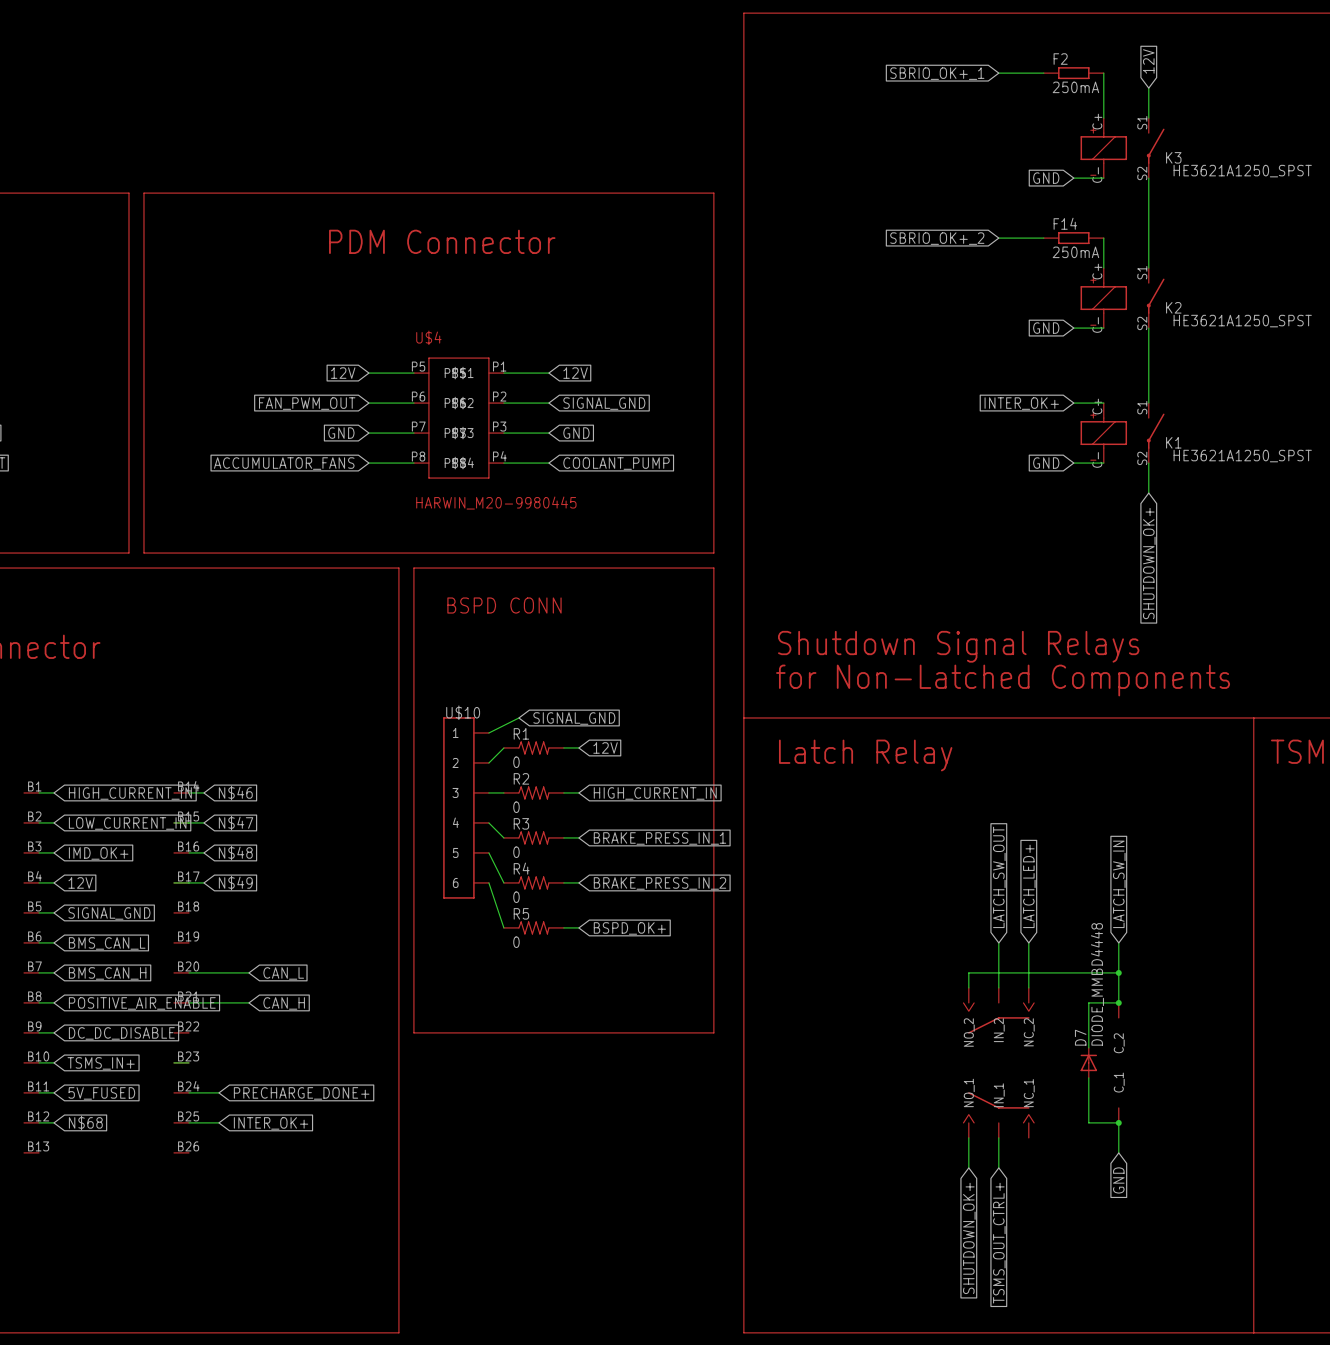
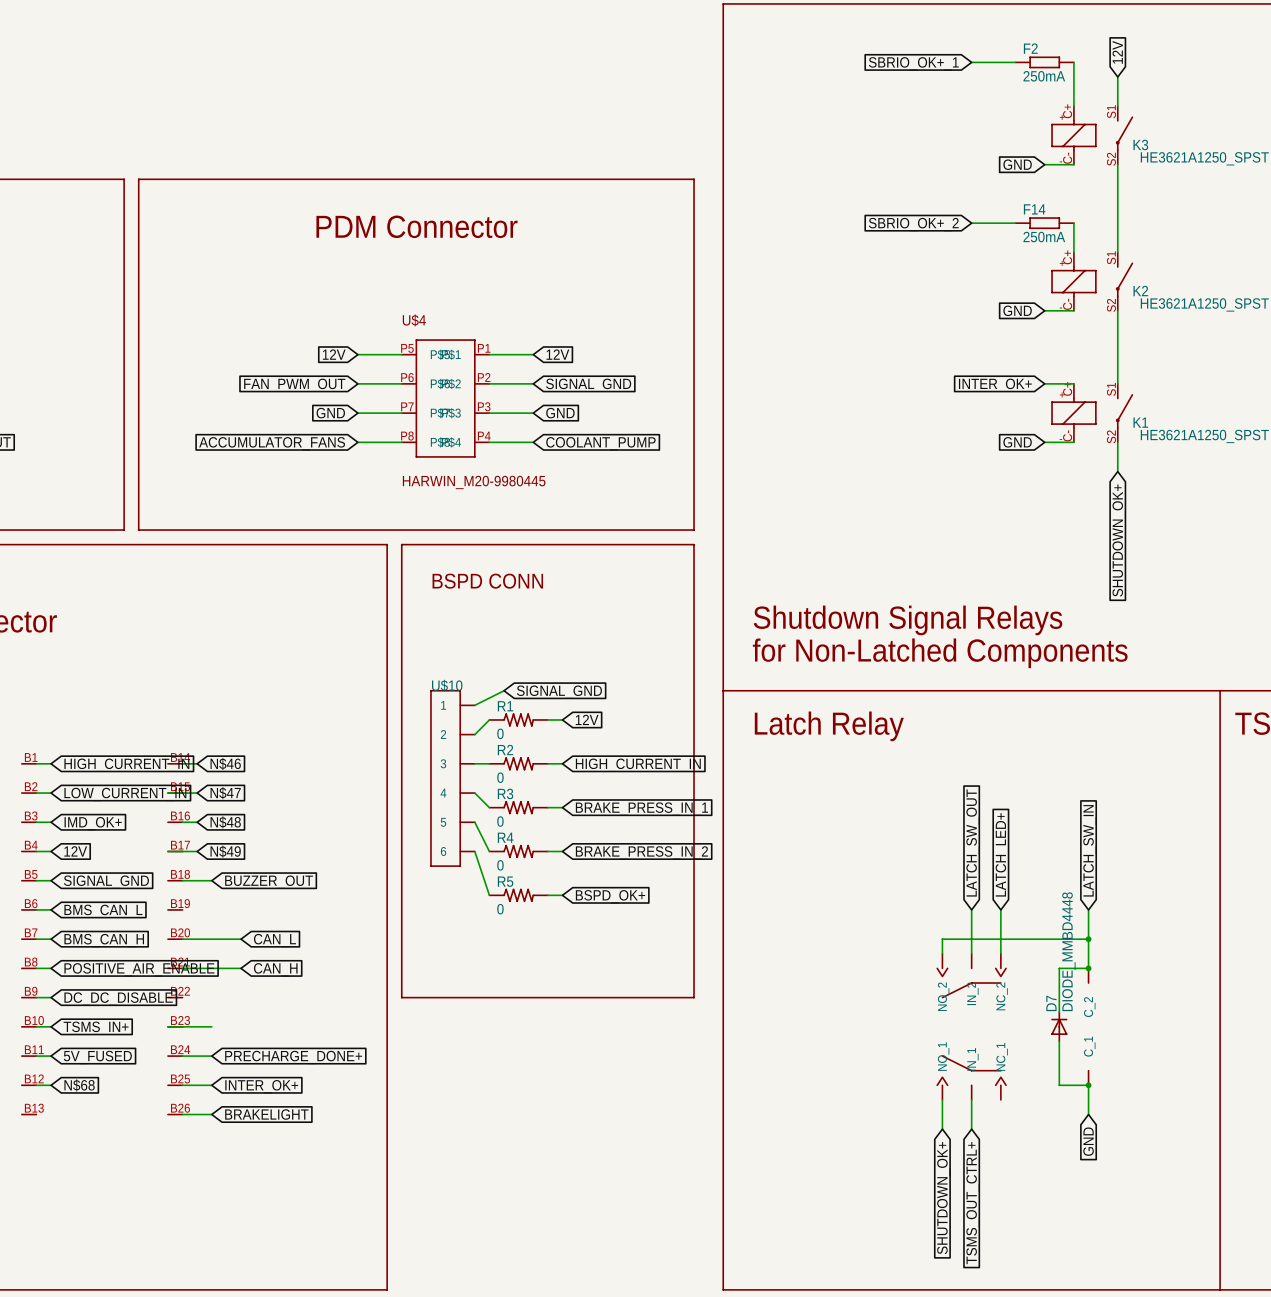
wire: none -> (182, 880) (211, 880)
global label: none -> BUZZER_OUT (269, 882)
wire: none -> (182, 1026) (211, 1026)
wire: none -> (182, 1114) (211, 1114)
global label: none -> BRAKELIGHT (266, 1114)

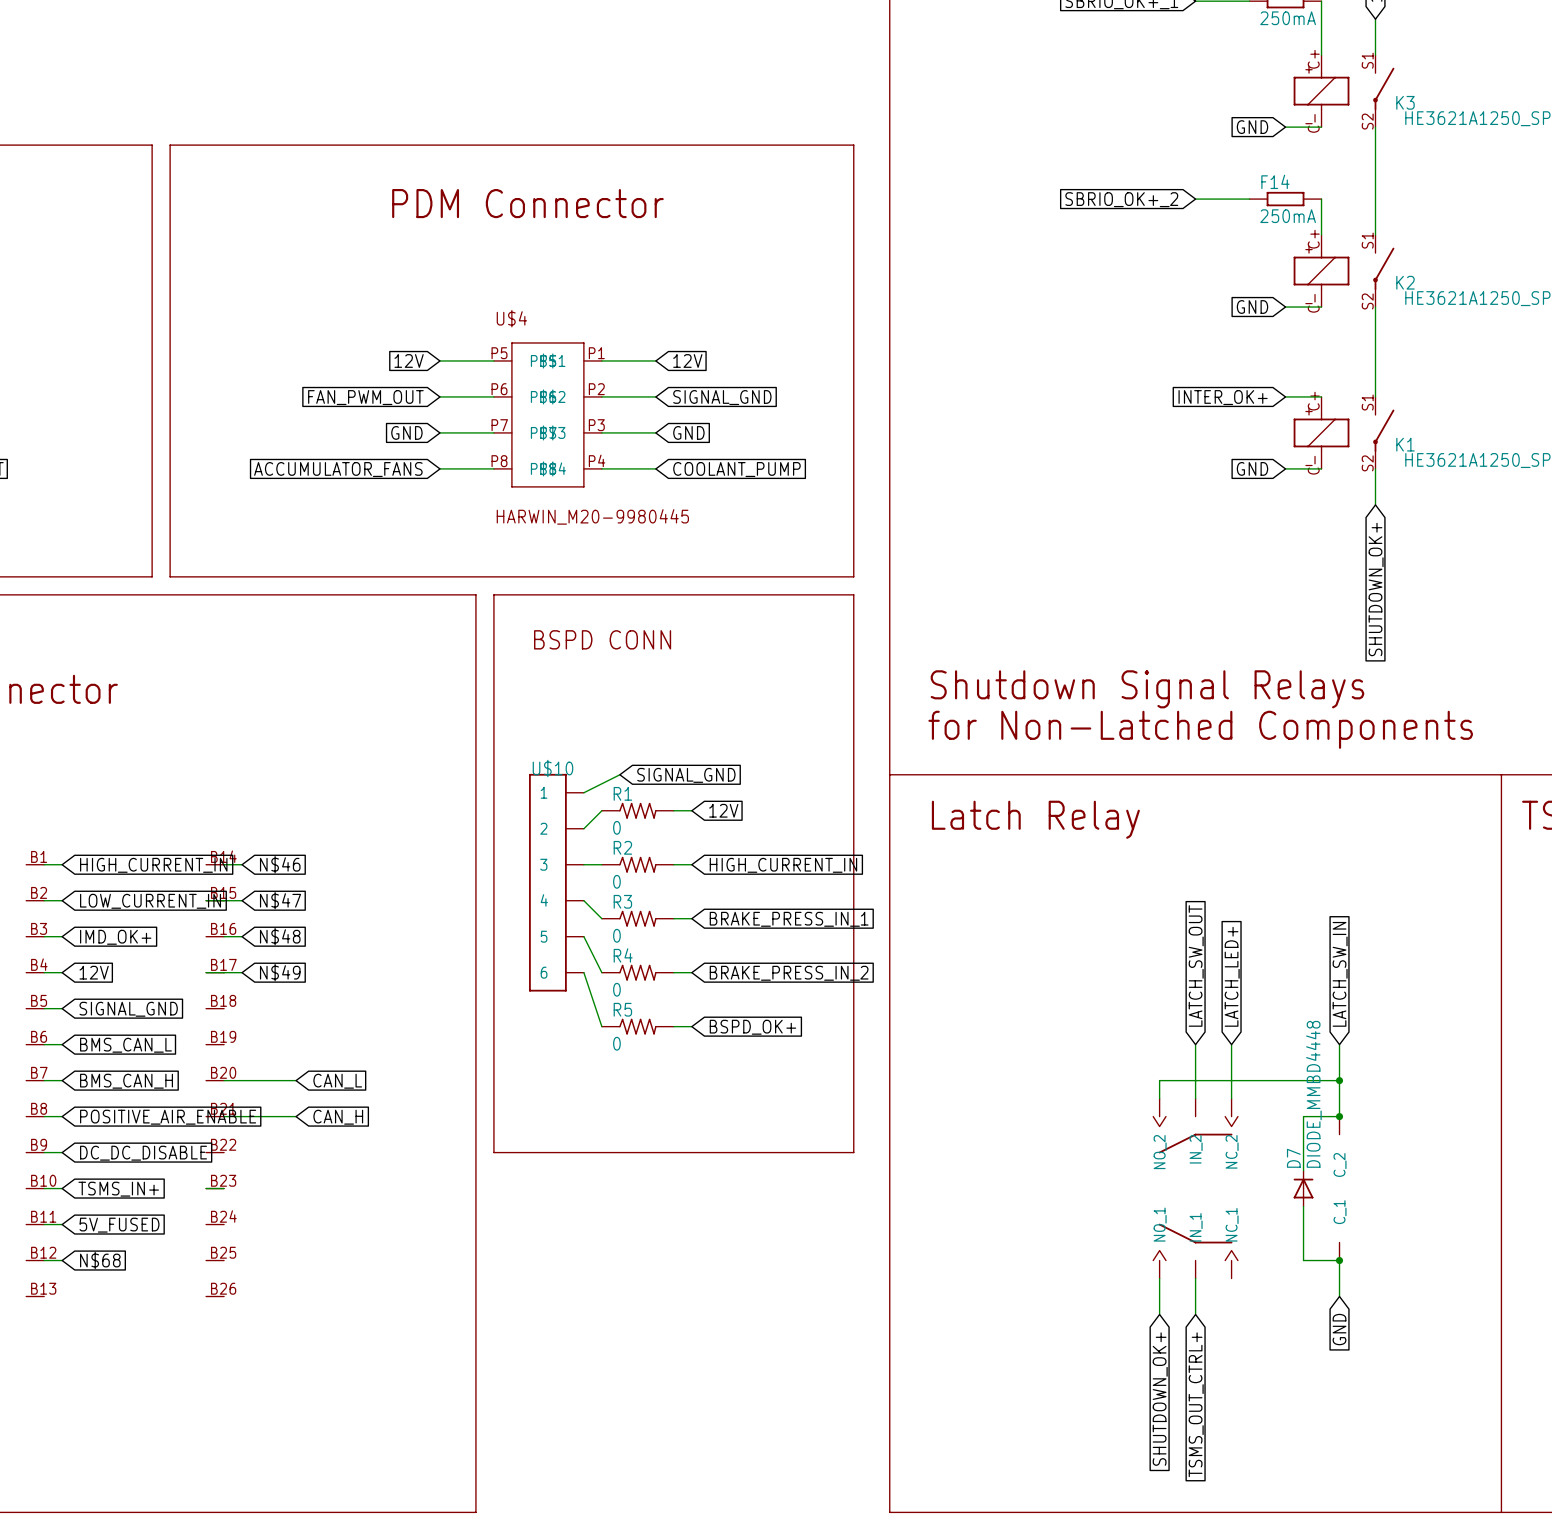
wire: (182, 880) (211, 880) -> none
global label: BUZZER_OUT (269, 882) -> none
wire: (182, 1026) (211, 1026) -> none
wire: (182, 1056) (211, 1056) -> none
global label: PRECHARGE_DONE+ (293, 1057) -> none
wire: (182, 1085) (211, 1085) -> none
global label: INTER_OK+ (261, 1086) -> none
wire: (182, 1114) (211, 1114) -> none
global label: BRAKELIGHT (266, 1114) -> none

